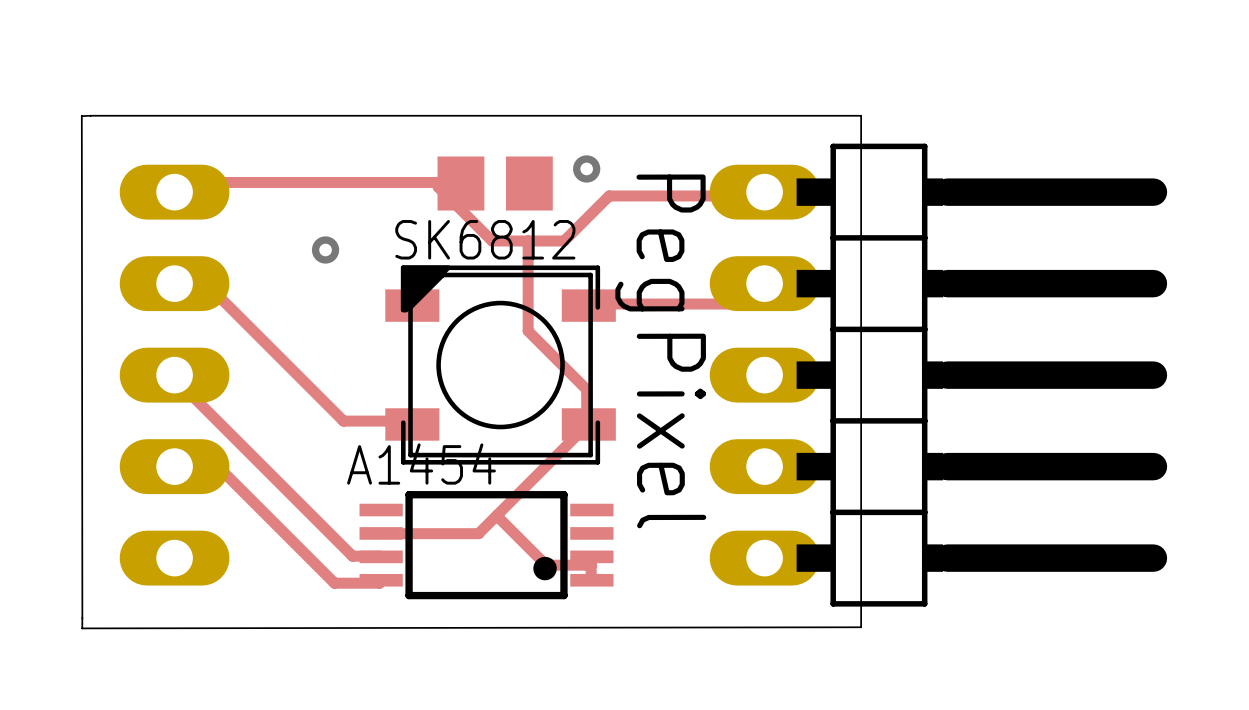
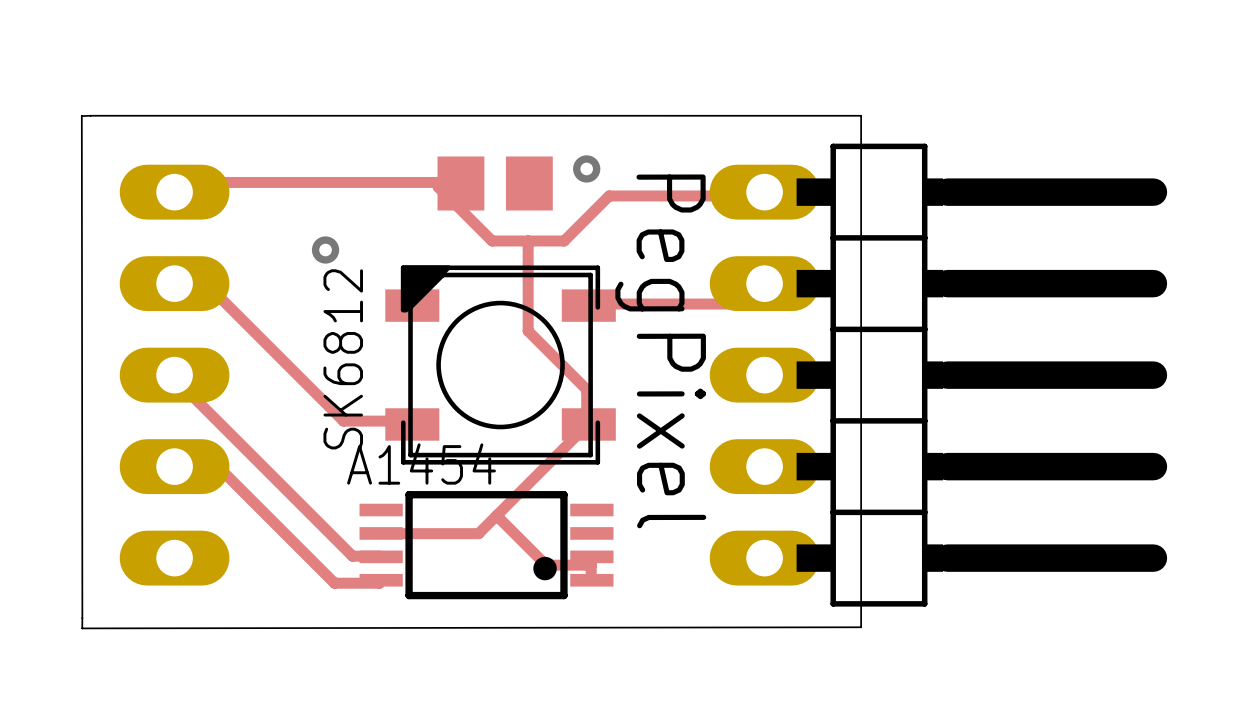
text rotation: 0° (485, 239) -> 90° counterclockwise (343, 359)

